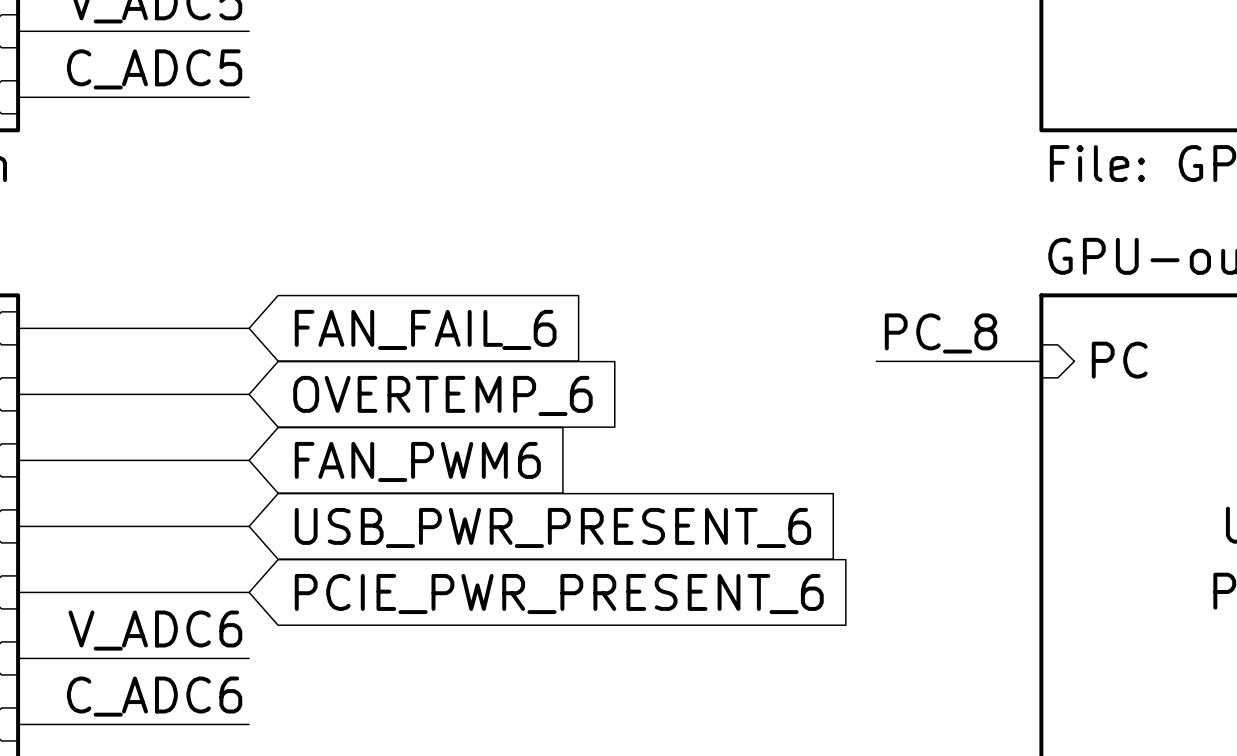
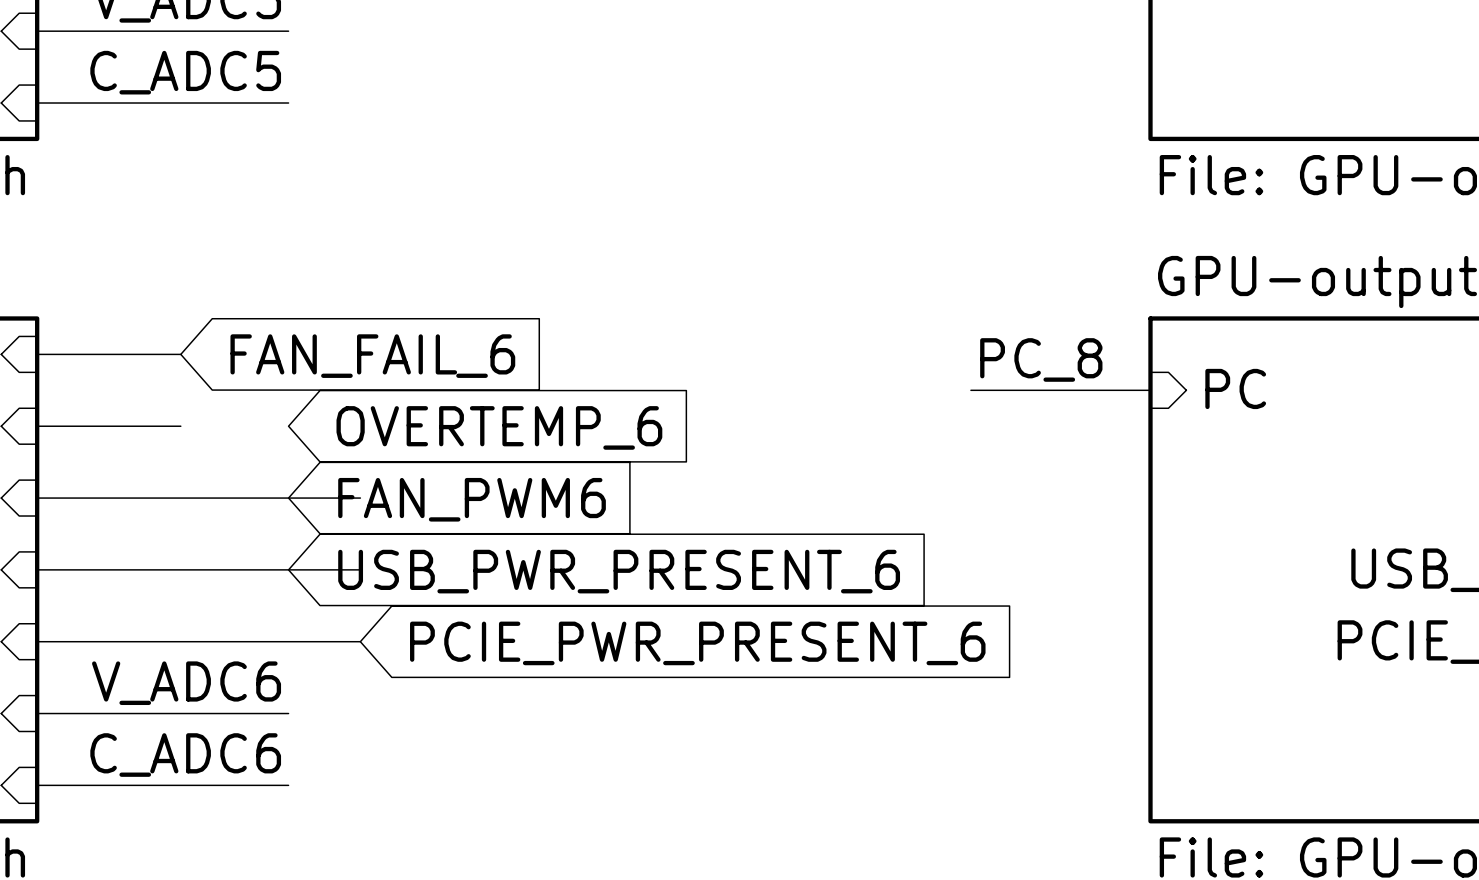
wire: (150, 328) (249, 328) -> none
global label position: FAN_FAIL_6 (425, 329) -> FAN_FAIL_6 (372, 356)
wire: (150, 394) (249, 394) -> none
wire: none -> (288, 498) (360, 498)
wire: none -> (288, 569) (360, 569)
wire: none -> (288, 641) (360, 641)
global label position: PCIE_PWR_PRESENT_6 (559, 594) -> PCIE_PWR_PRESENT_6 (697, 643)

